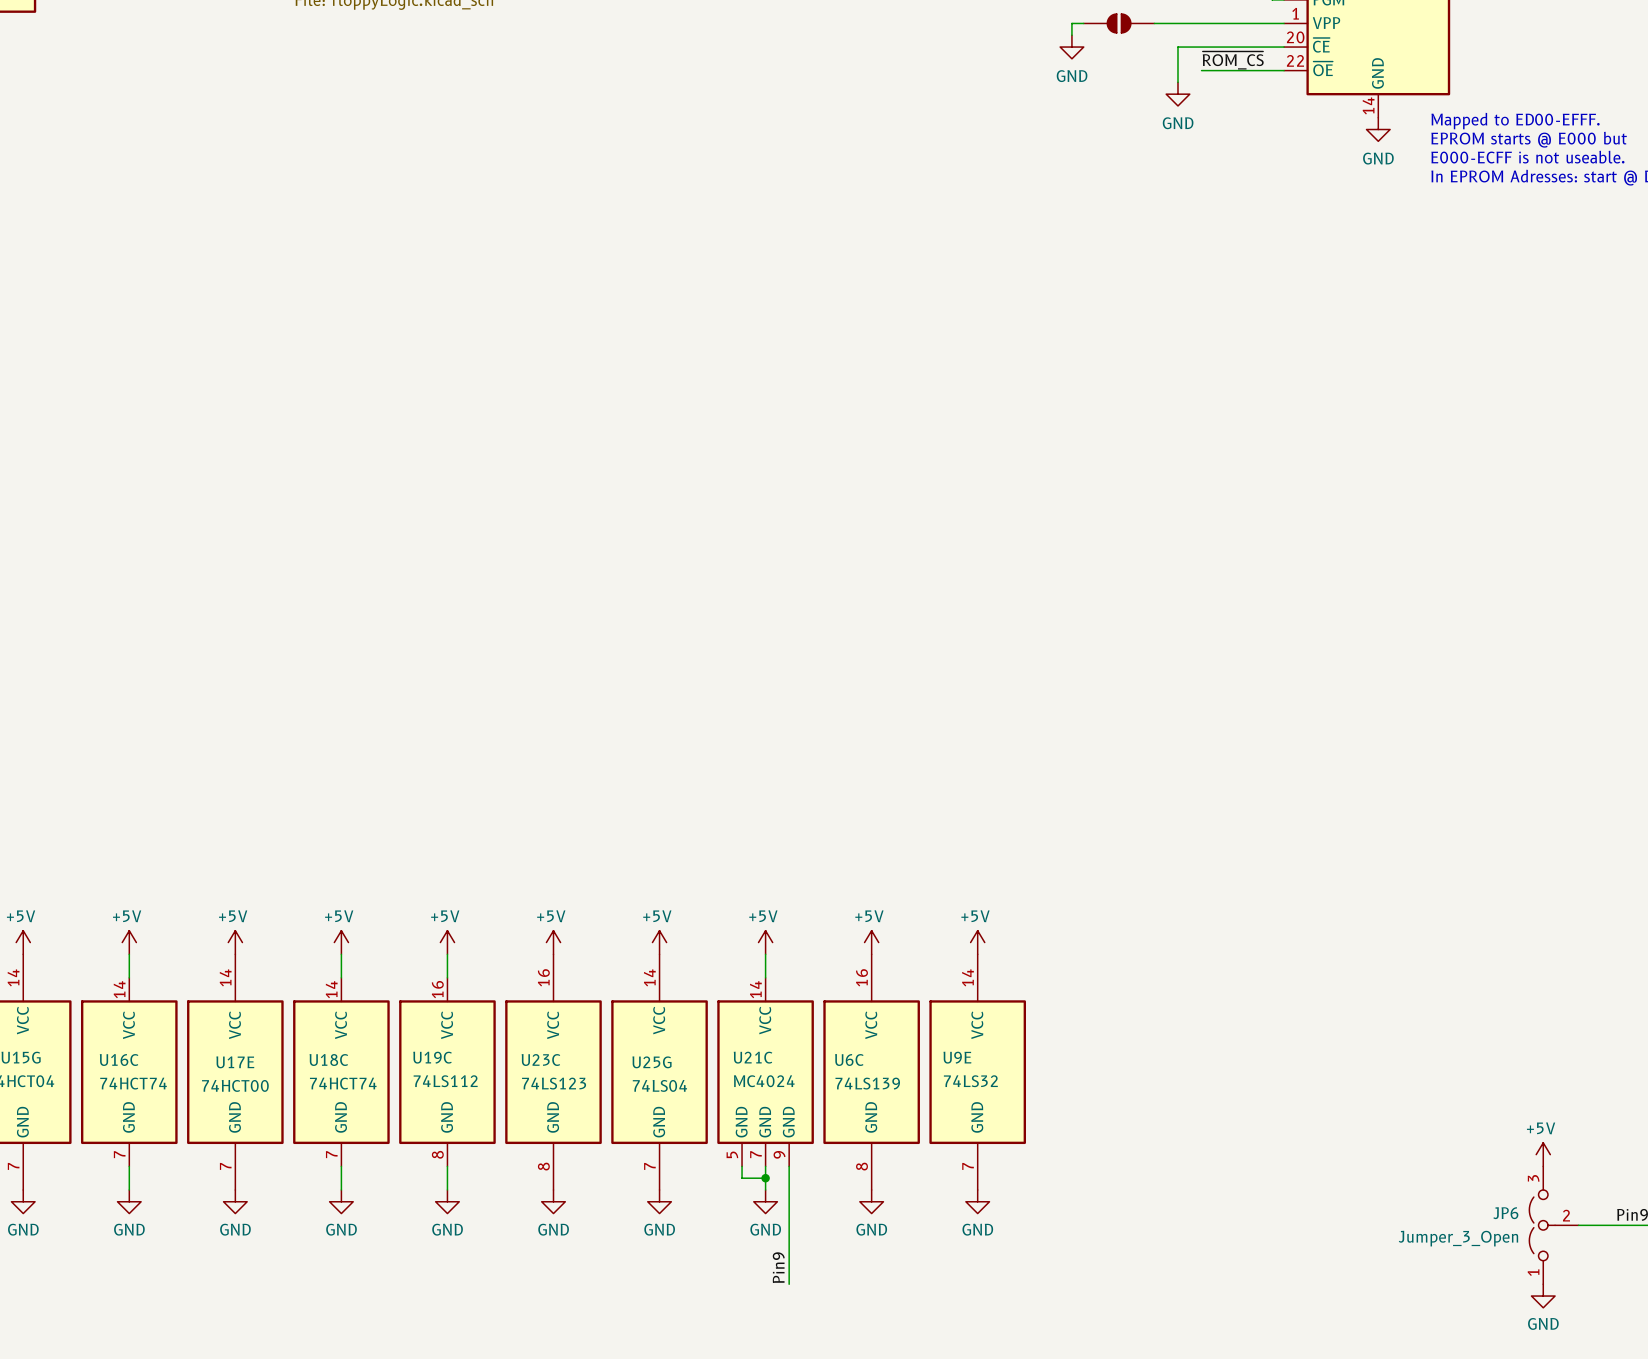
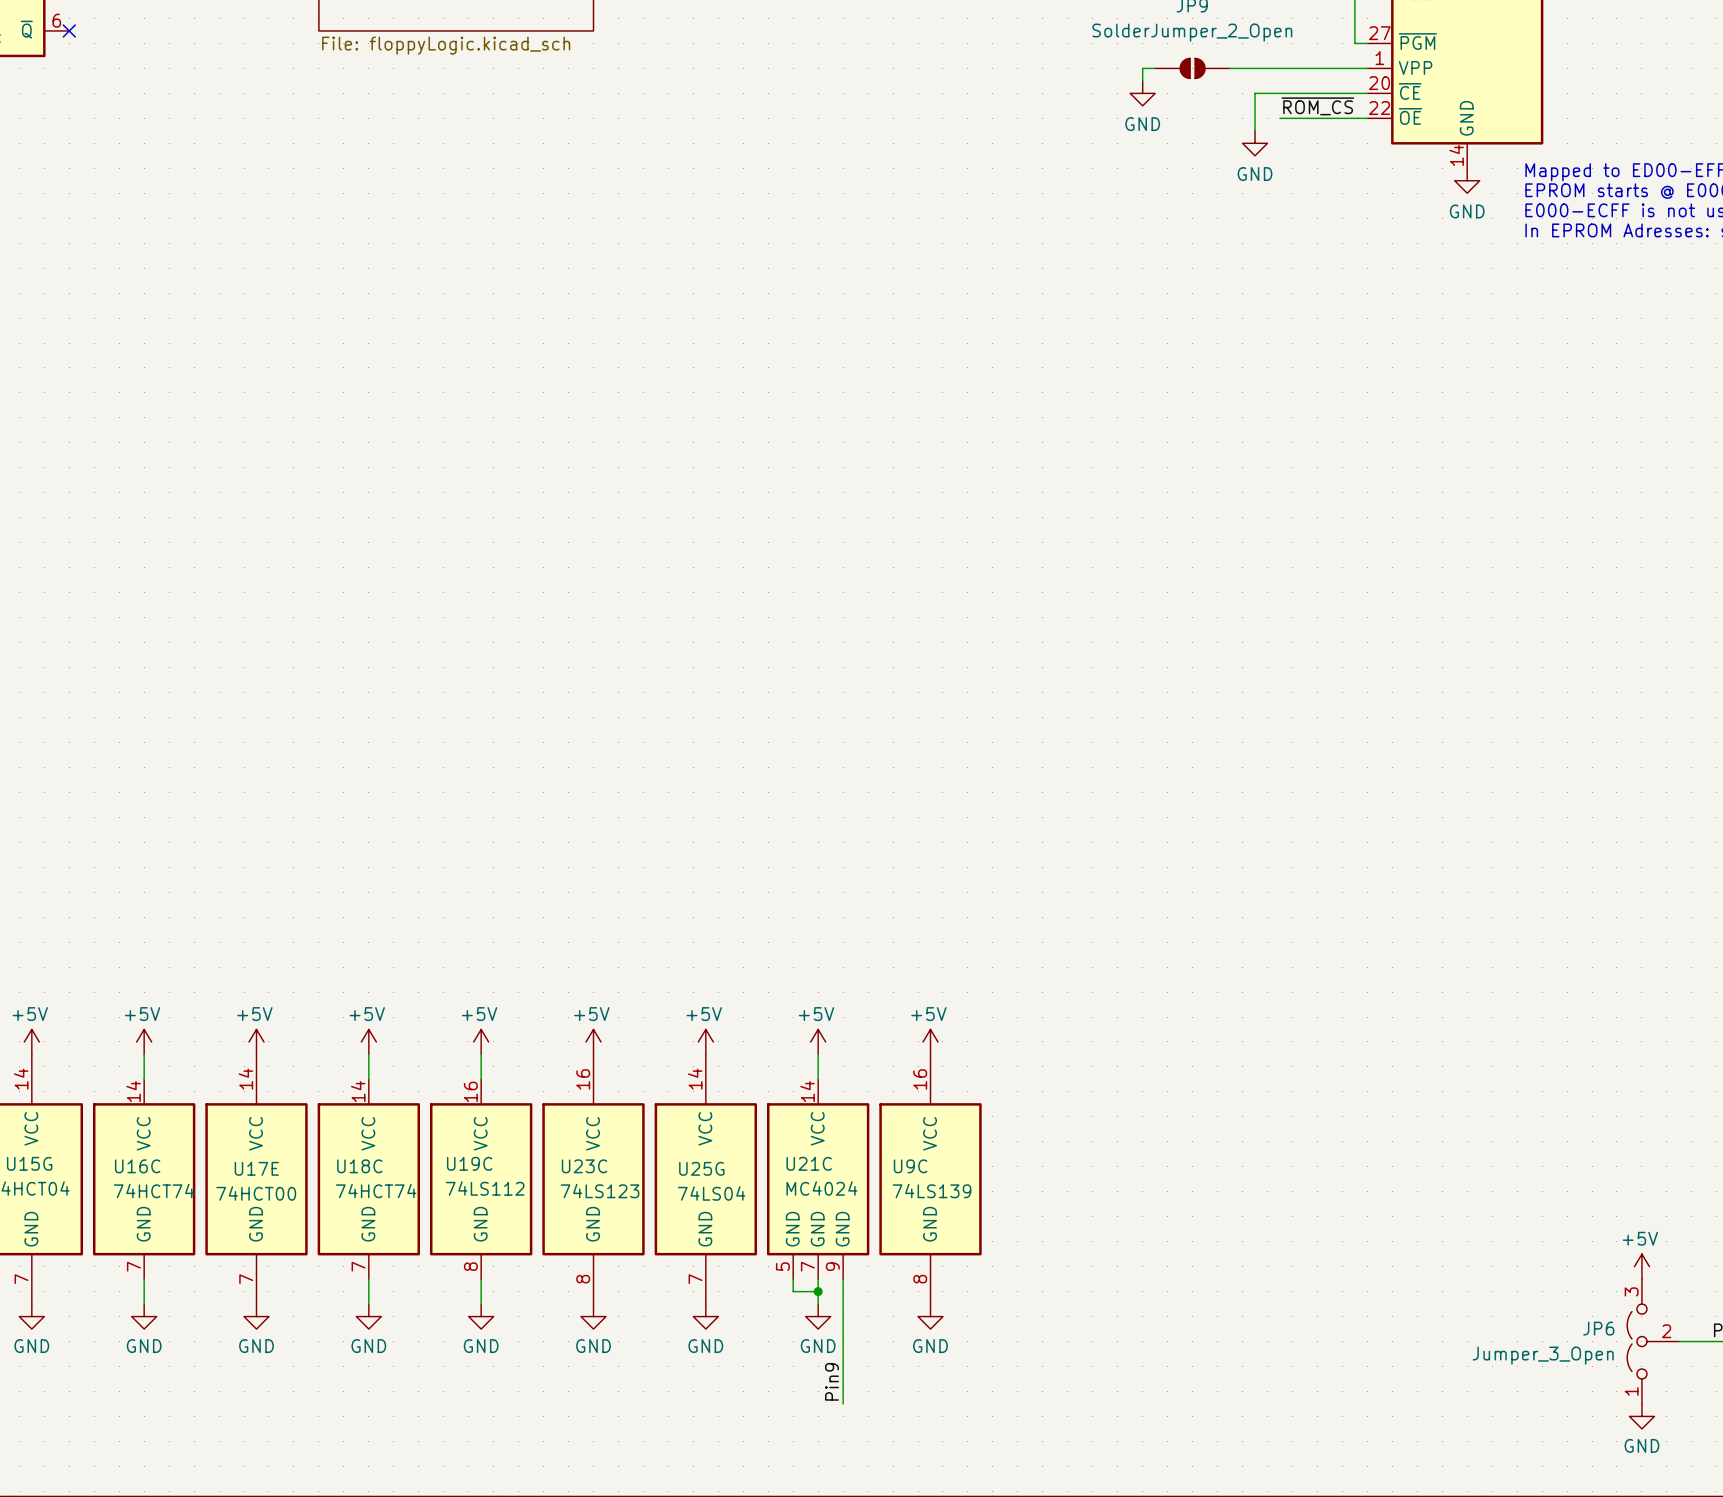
power symbol: +5V (977, 942) -> none
U6C name: U6C (849, 1060) -> U9C (910, 1166)
U9E: 74LS32 (977, 1072) -> none
power symbol: GND (977, 1201) -> none

